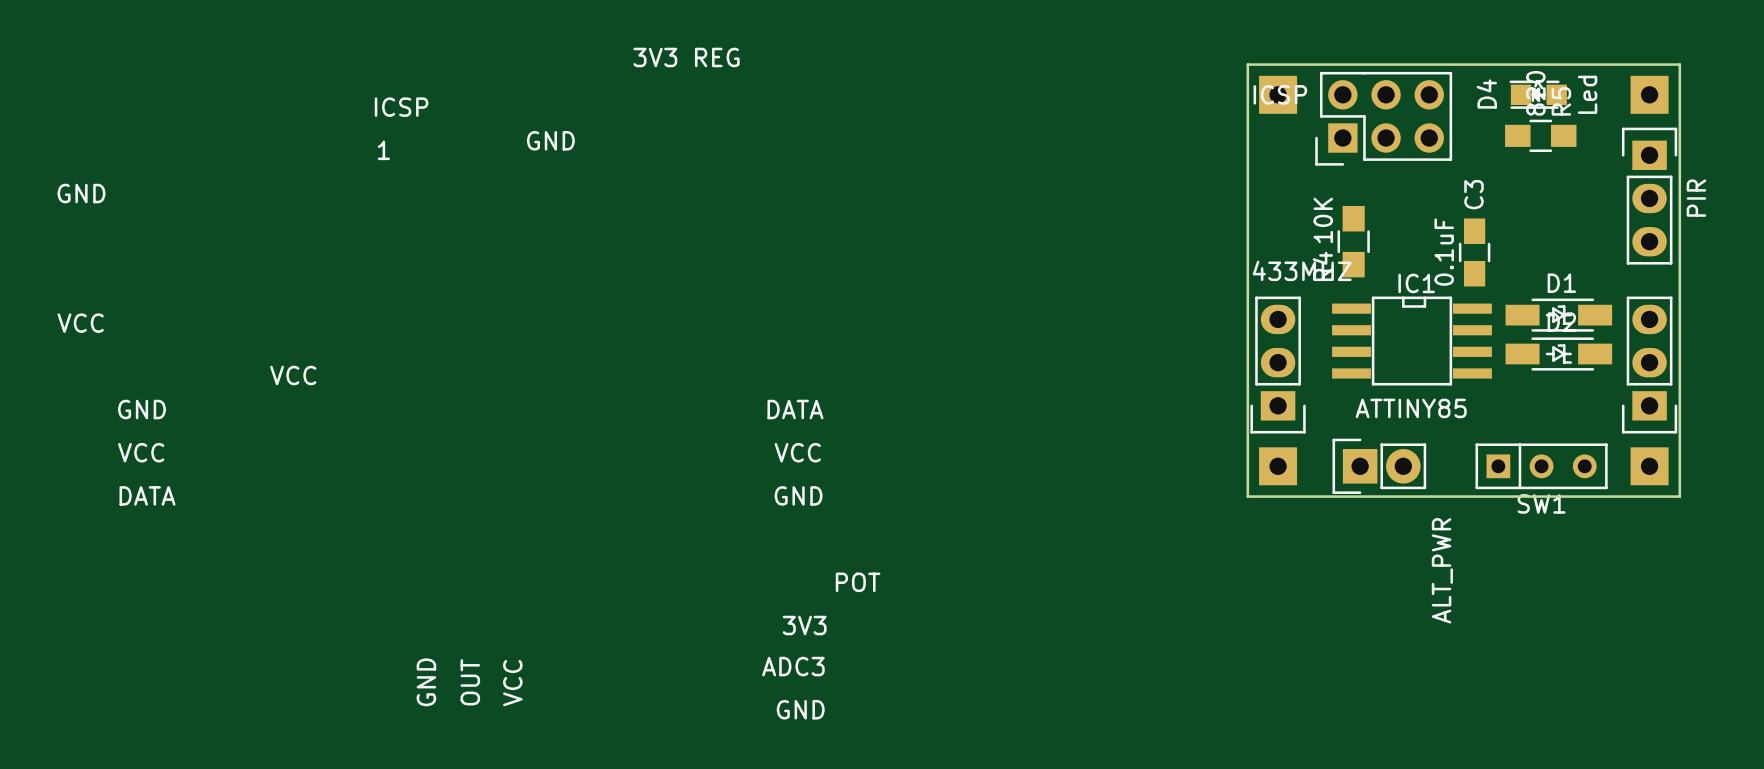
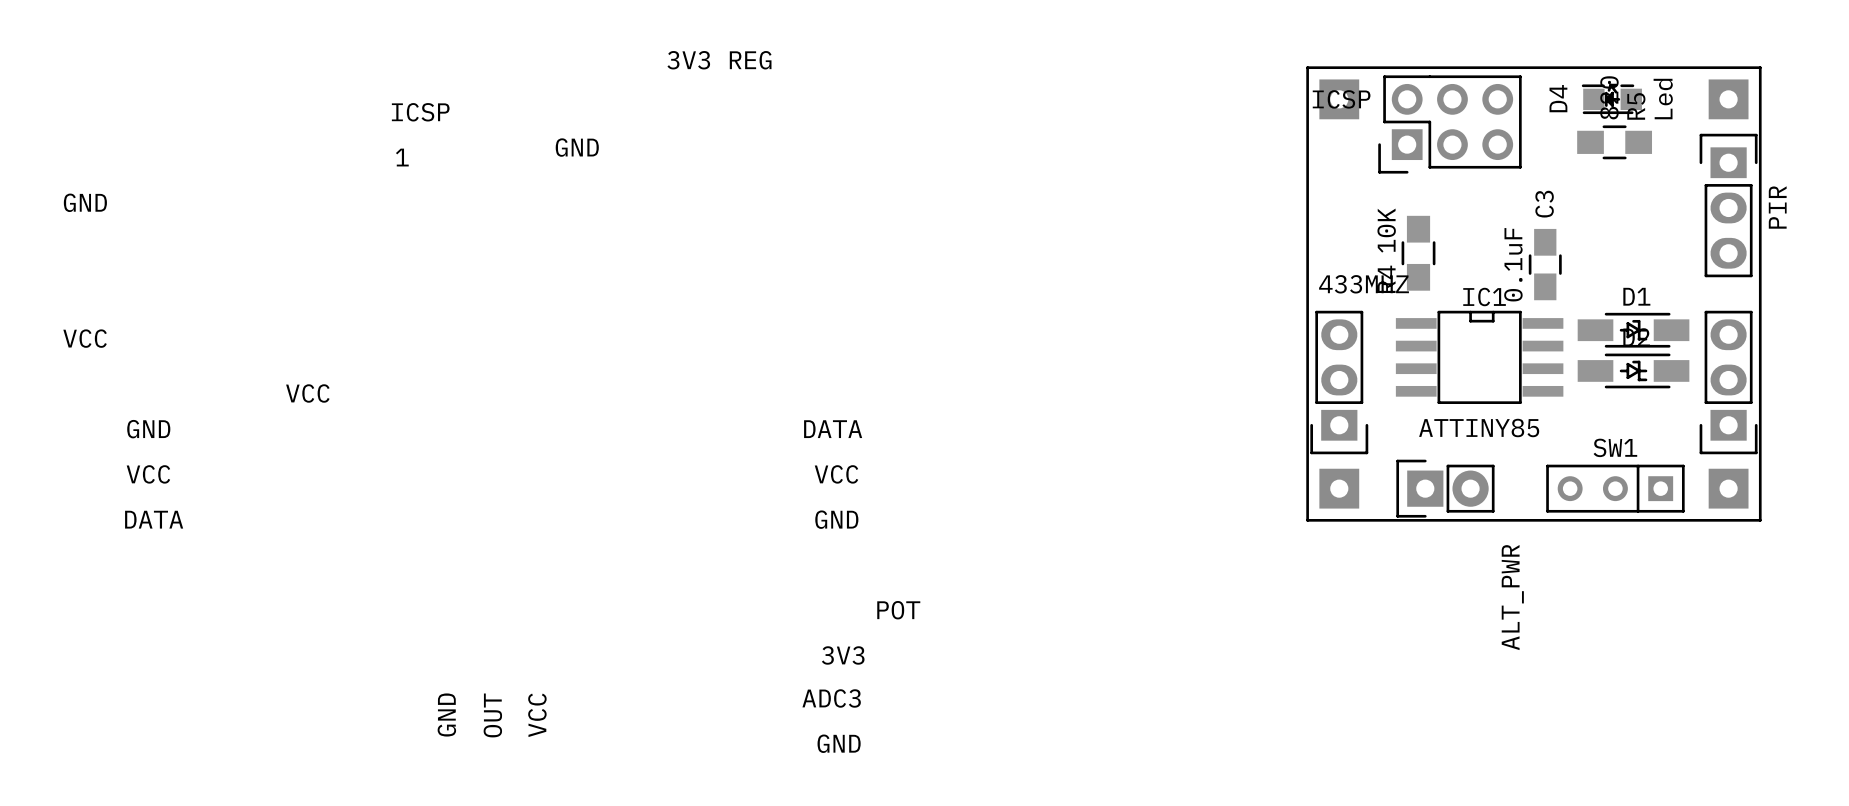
SW1 rotation: 0° (1541, 466) -> 180° (1615, 488)

